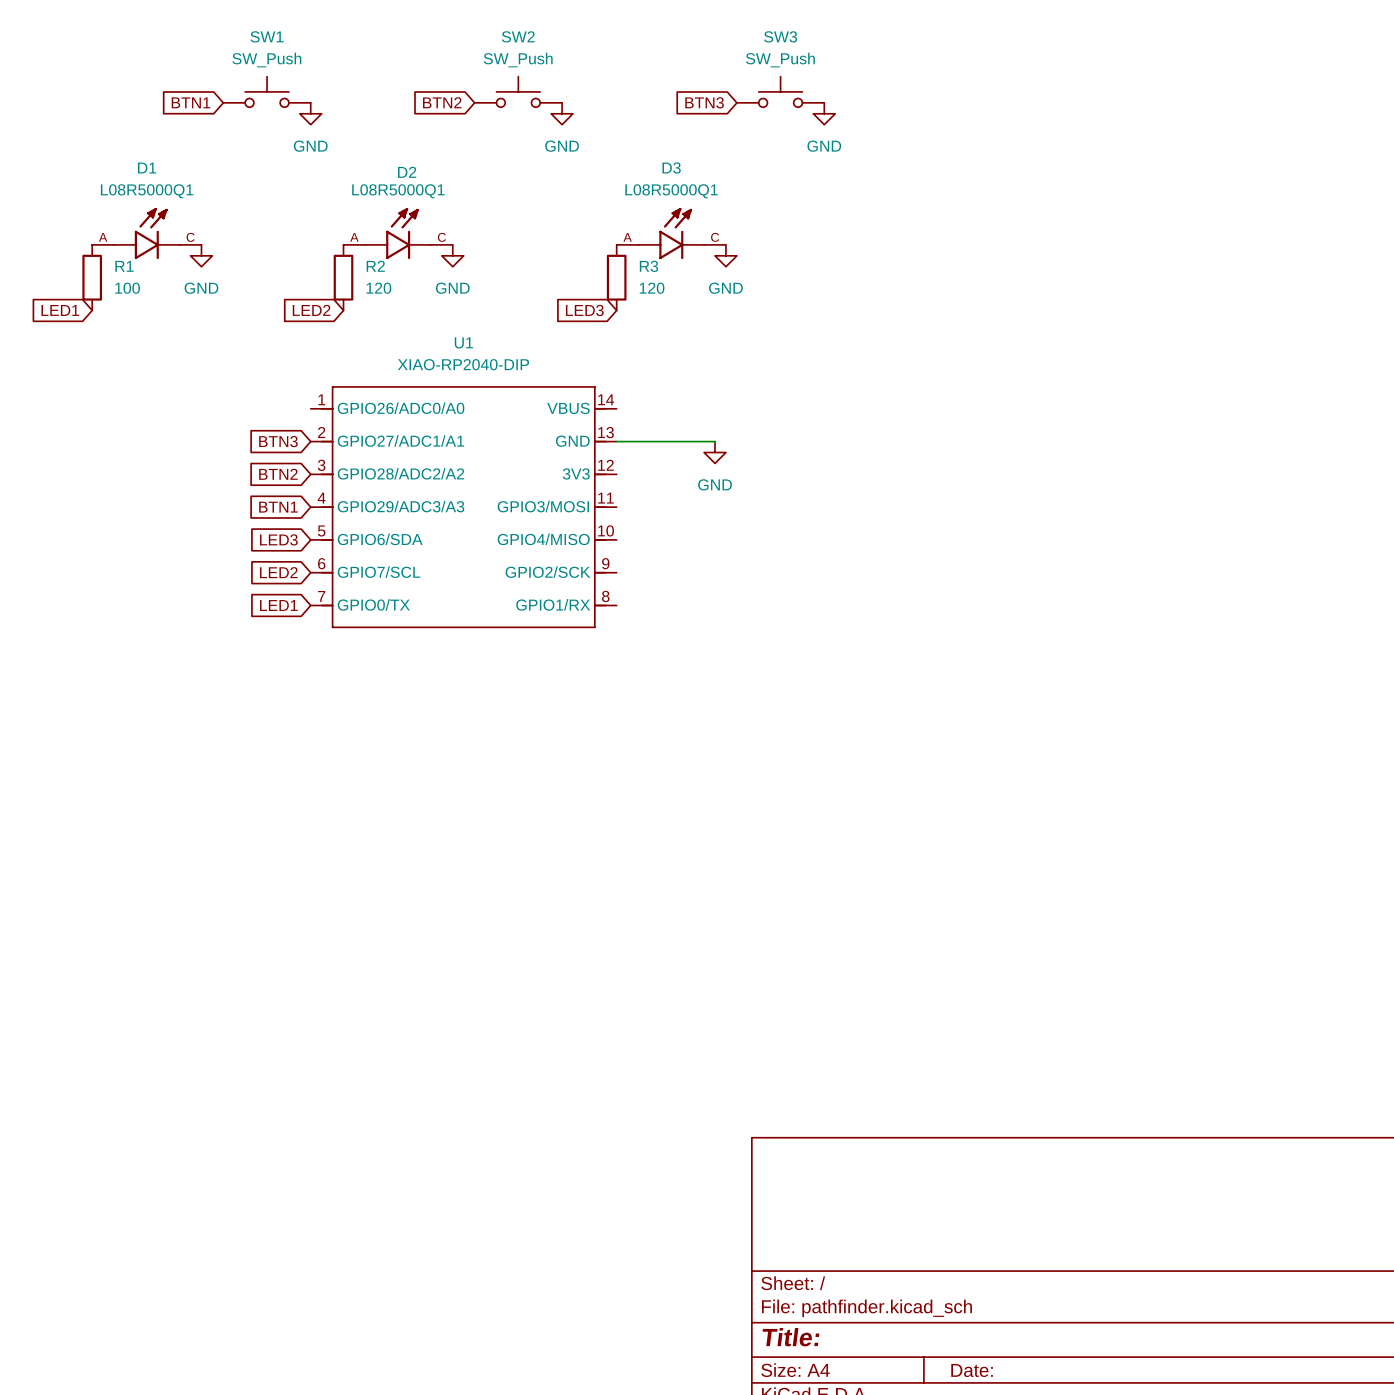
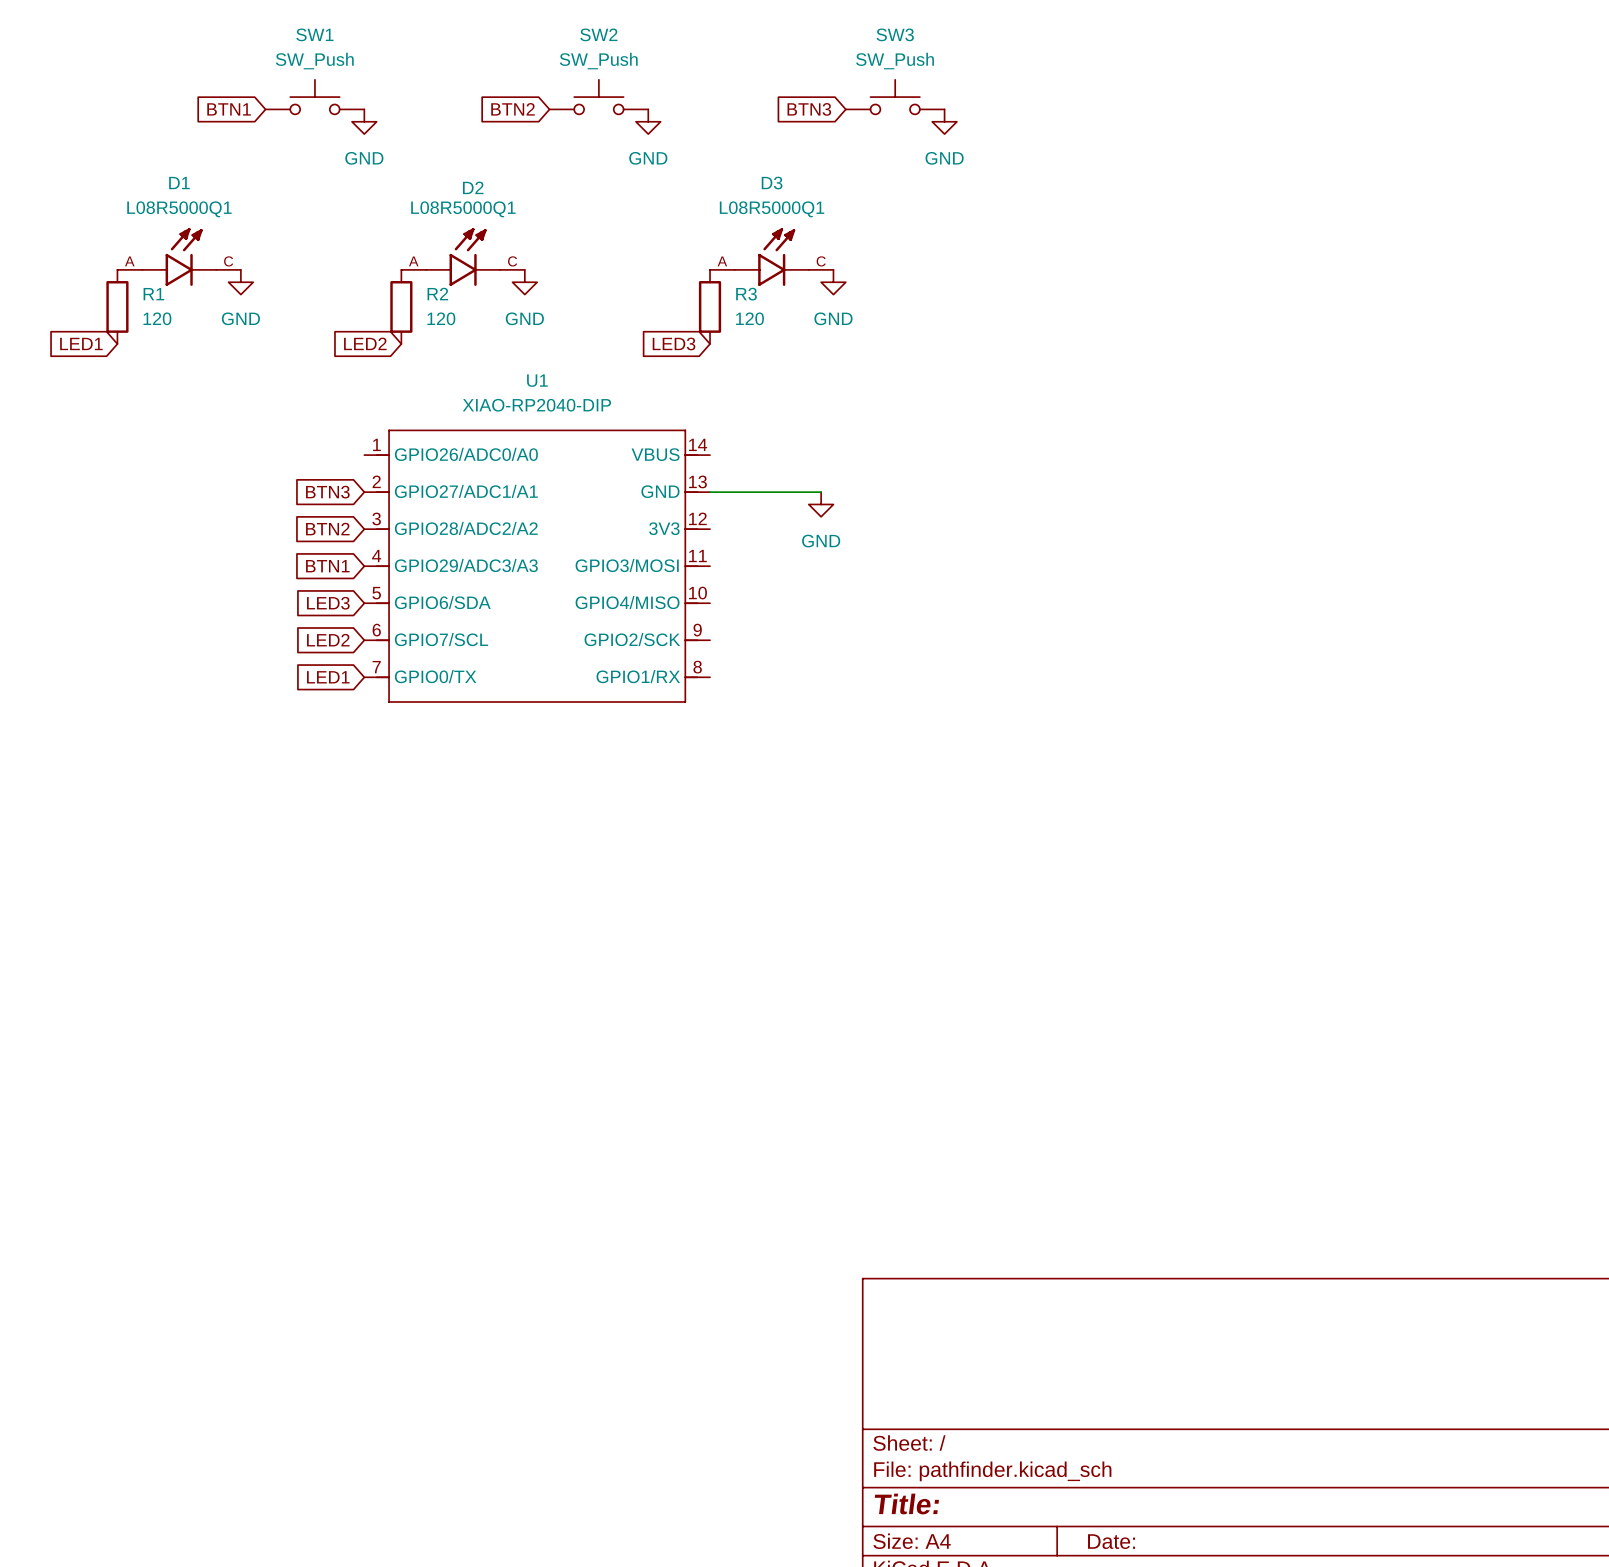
R1 value: 100 (127, 288) -> 120 (157, 318)

